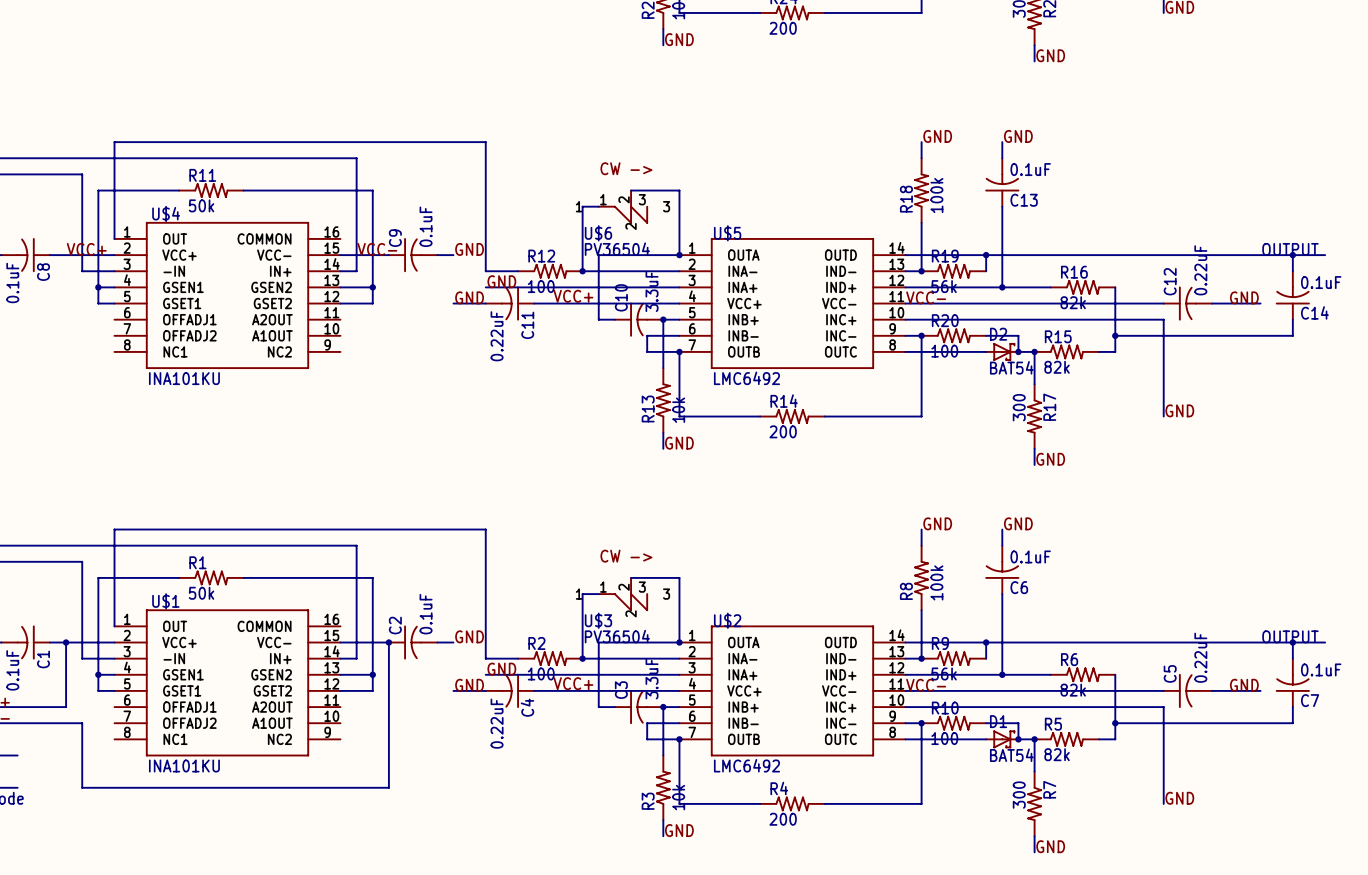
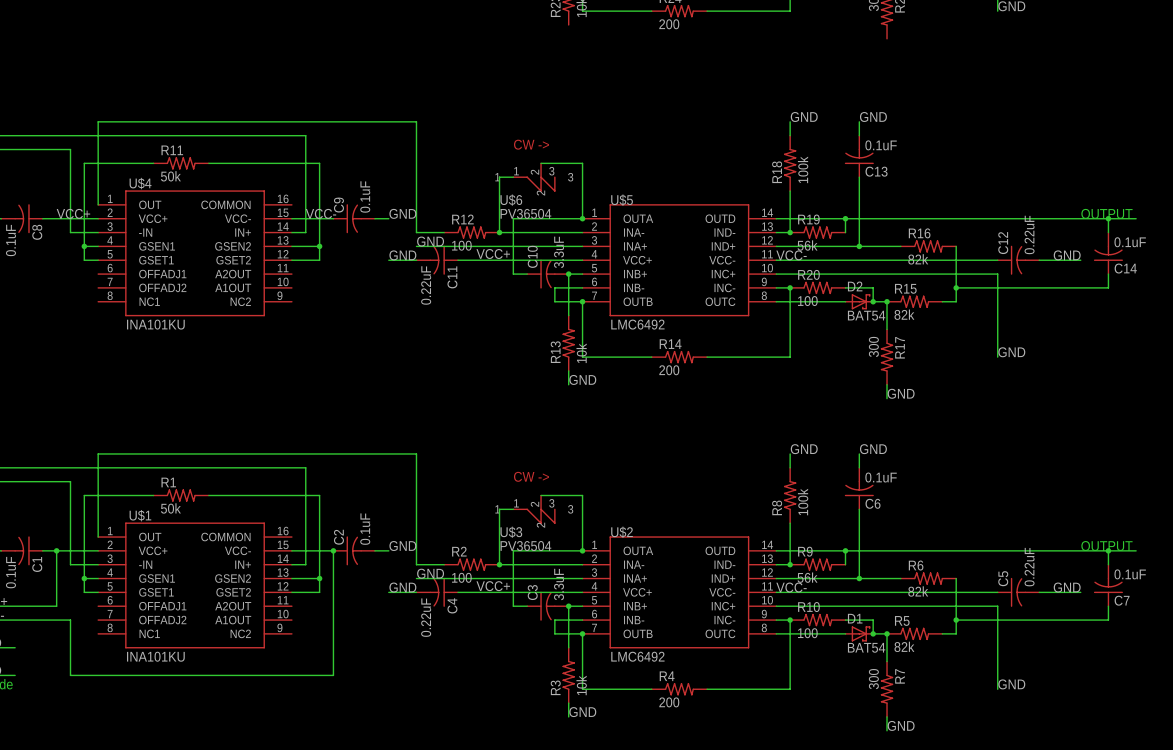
wire: (663, 29) (663, 45) -> none
label: GND (679, 39) -> none
wire: (1034, 45) (1034, 61) -> none
label: GND (1050, 55) -> none

